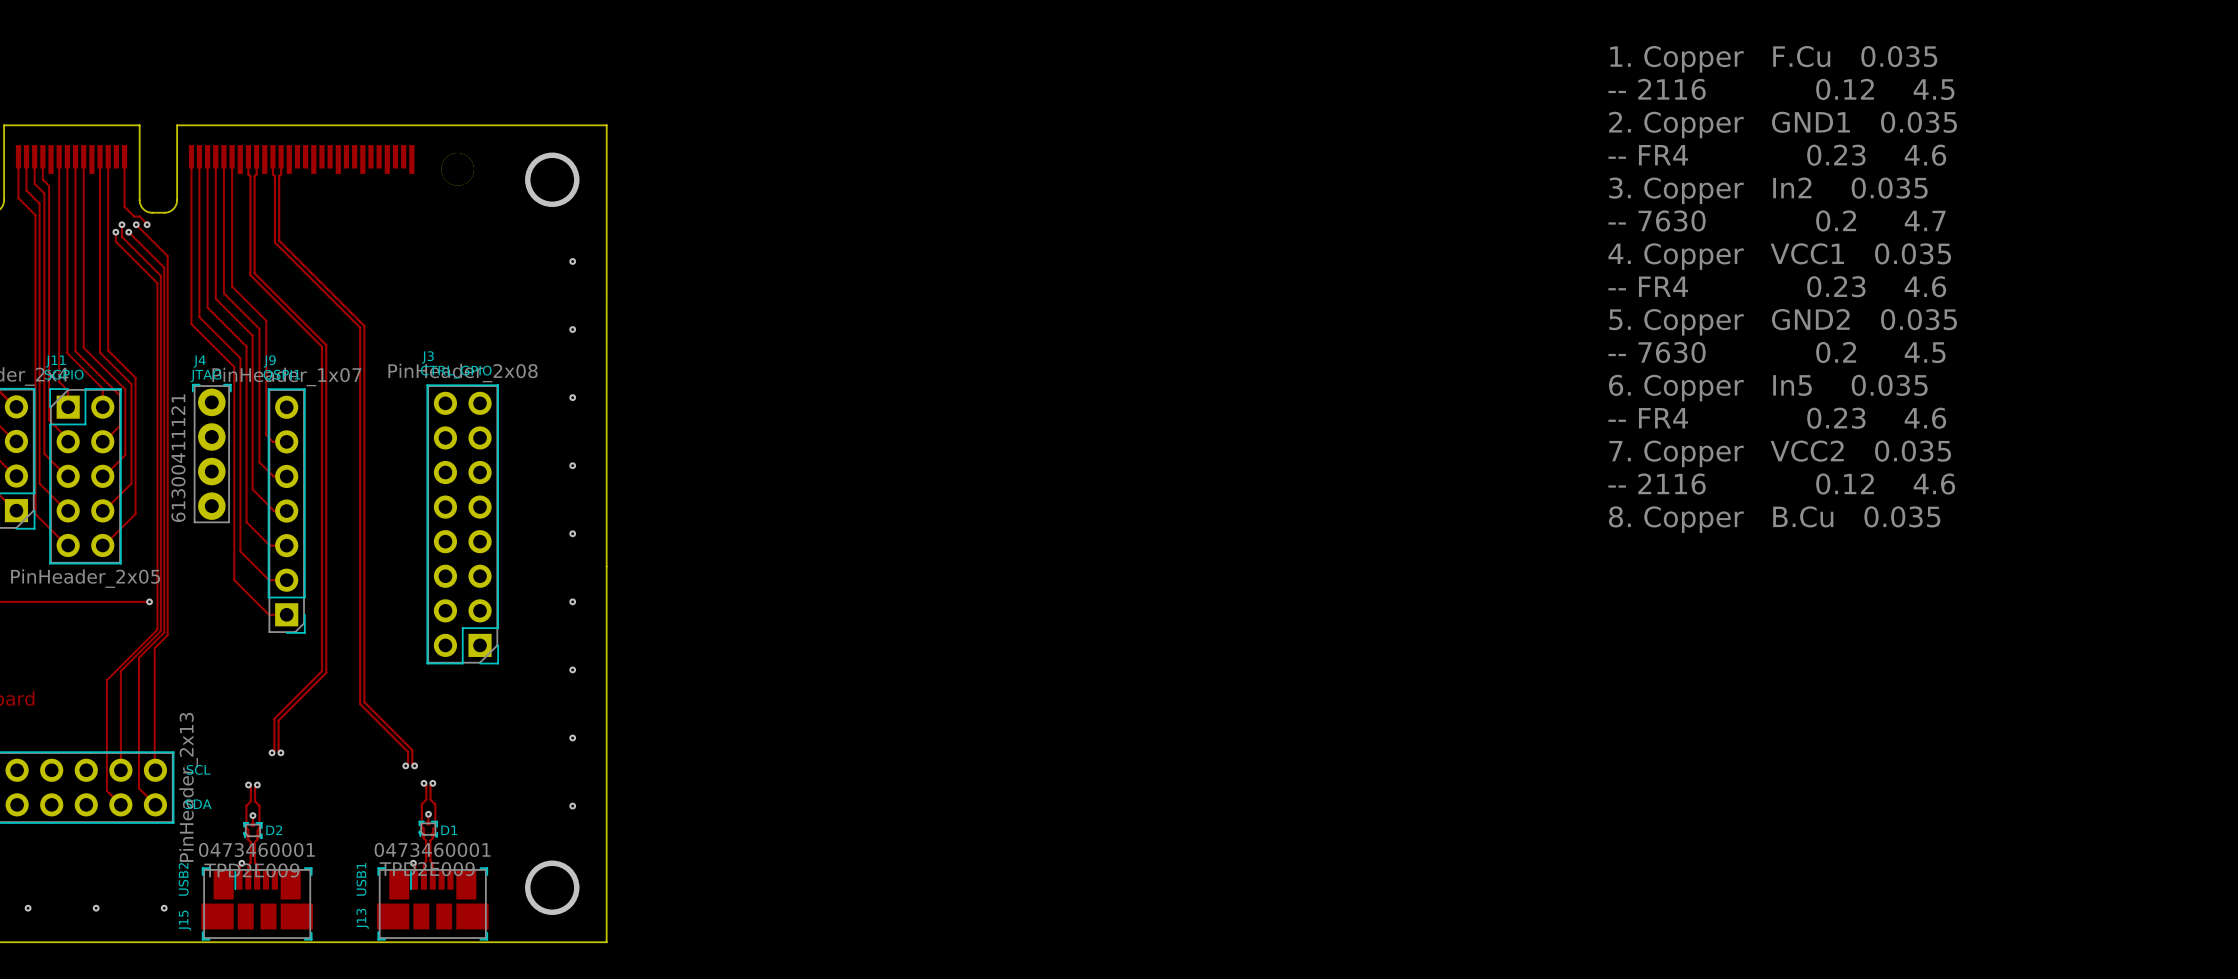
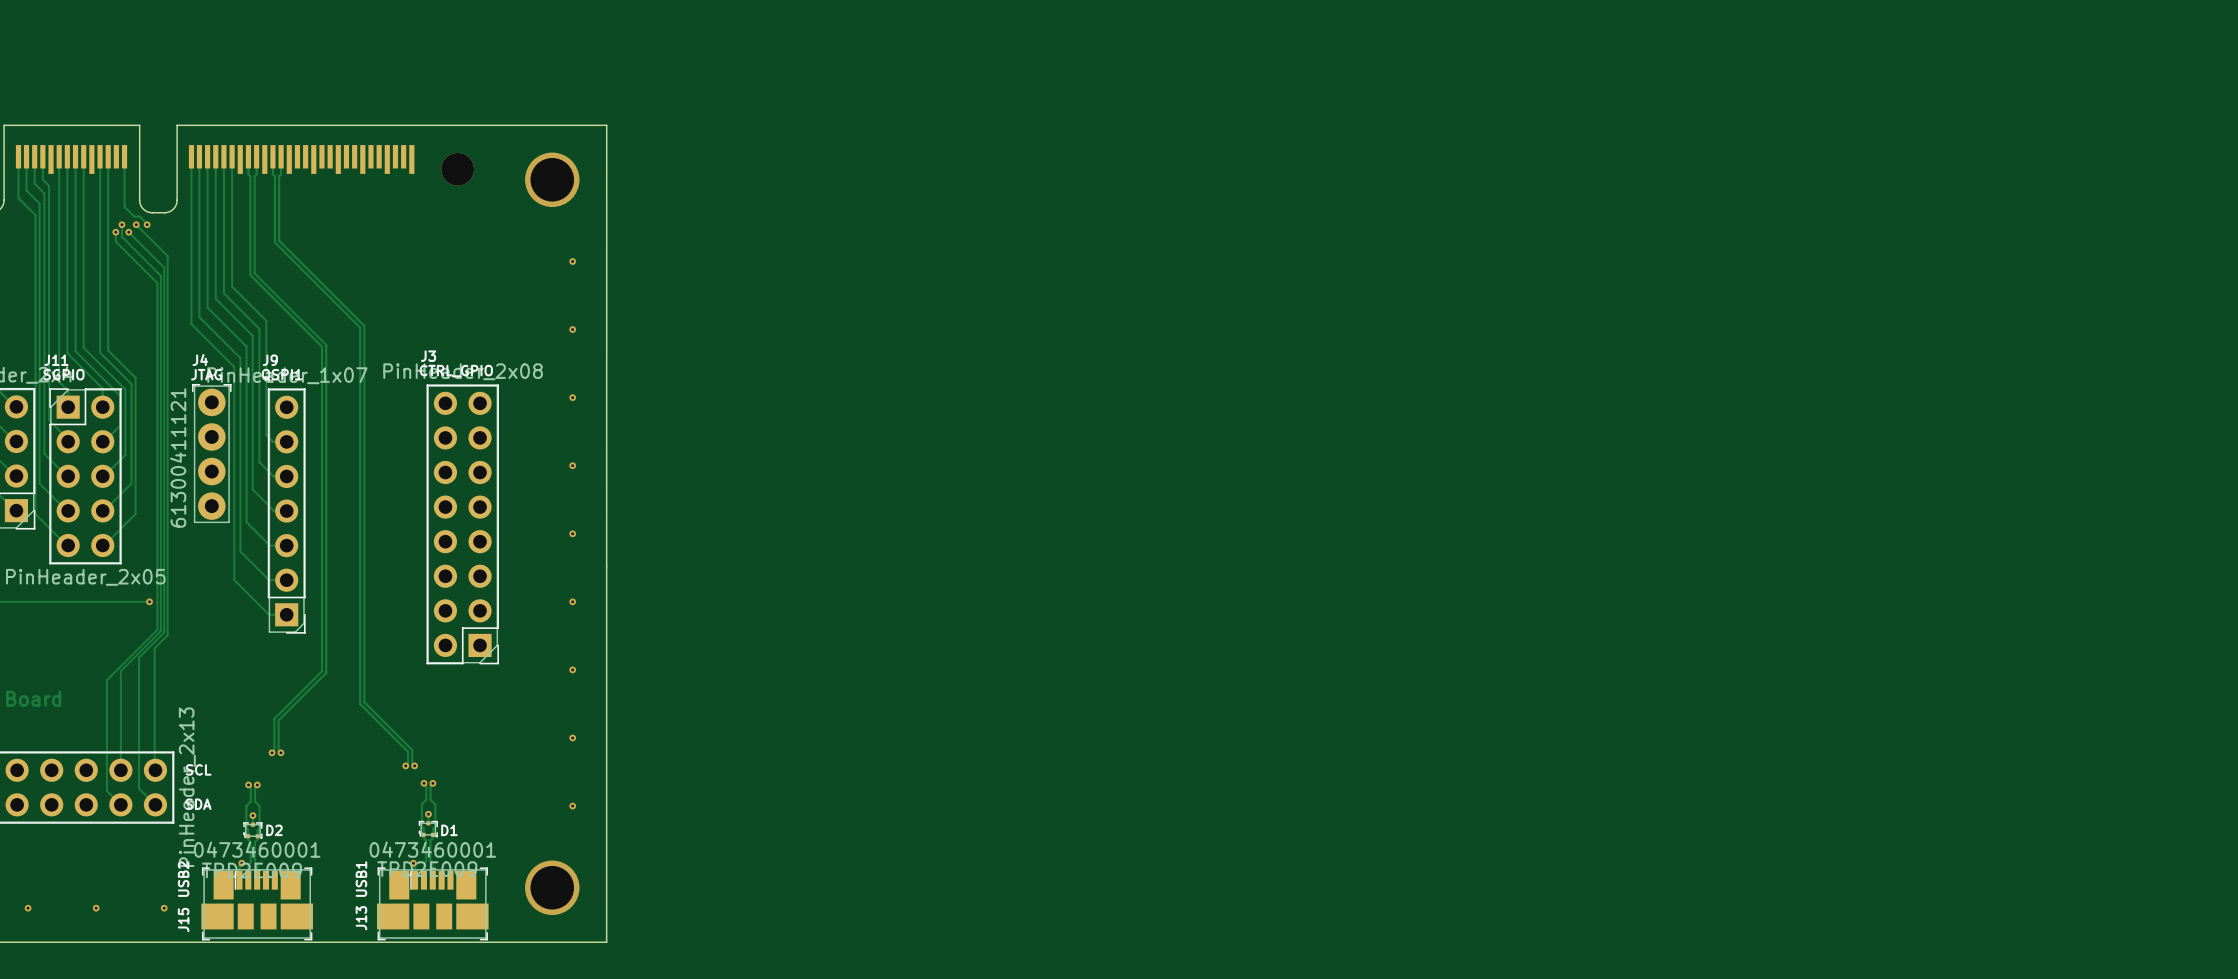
text: 1. Copper F.Cu 0.035 (1773, 59) -> none
text: -- 2116 0.12 4.5 (1781, 89) -> none
text: 2. Copper GND1 0.035 (1783, 125) -> none
text: -- FR4 0.23 4.6 (1777, 155) -> none
text: 3. Copper In2 0.035 (1768, 190) -> none
text: -- 7630 0.2 4.7 (1777, 220) -> none
text: 4. Copper VCC1 0.035 (1779, 256) -> none
text: -- FR4 0.23 4.6 (1777, 286) -> none
text: 5. Copper GND2 0.035 (1783, 322) -> none
text: -- 7630 0.2 4.5 (1776, 352) -> none
text: 6. Copper In5 0.035 (1768, 388) -> none
text: -- FR4 0.23 4.6 (1777, 418) -> none
text: 7. Copper VCC2 0.035 (1780, 453) -> none
text: -- 2116 0.12 4.6 (1781, 484) -> none
text: 8. Copper B.Cu 0.035 (1774, 519) -> none

